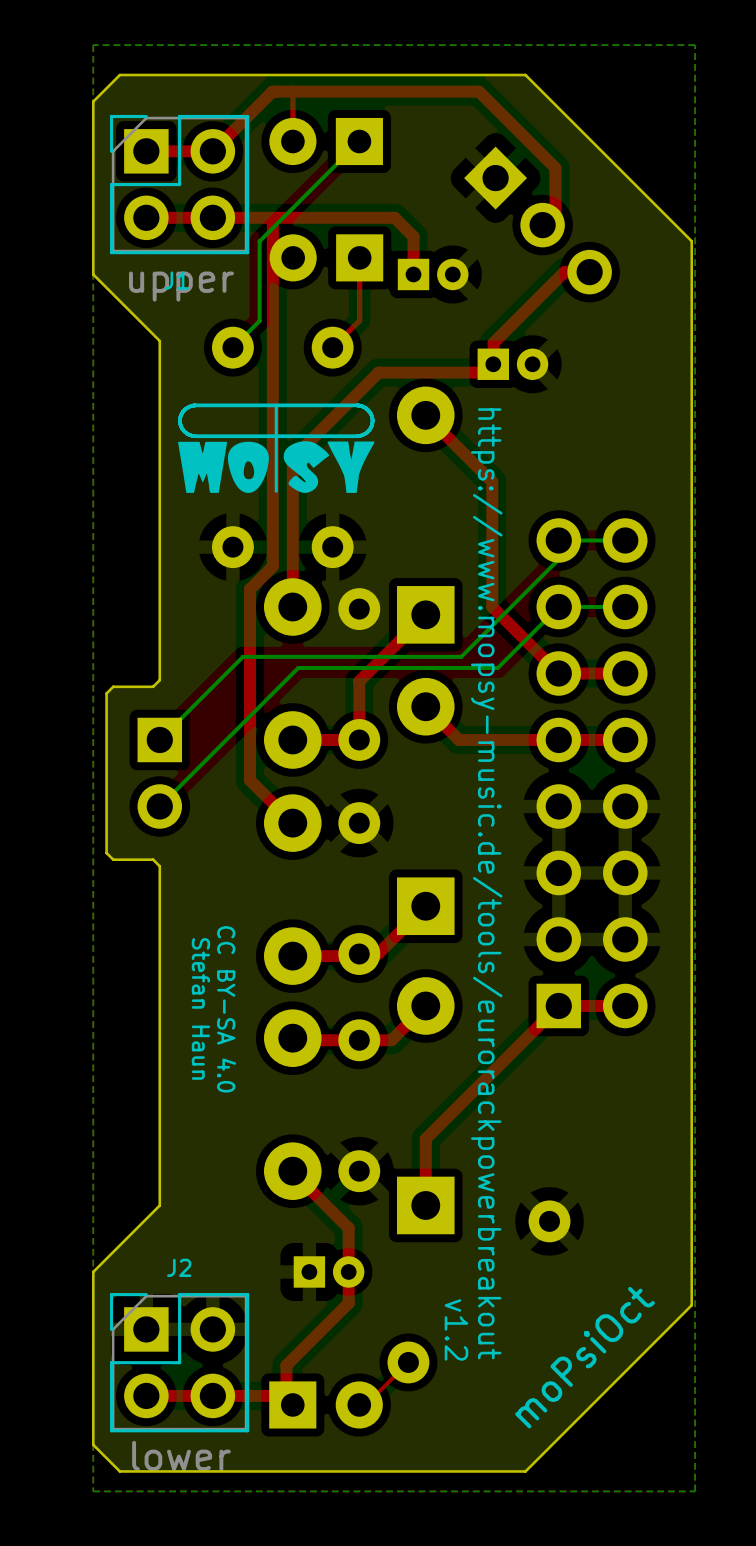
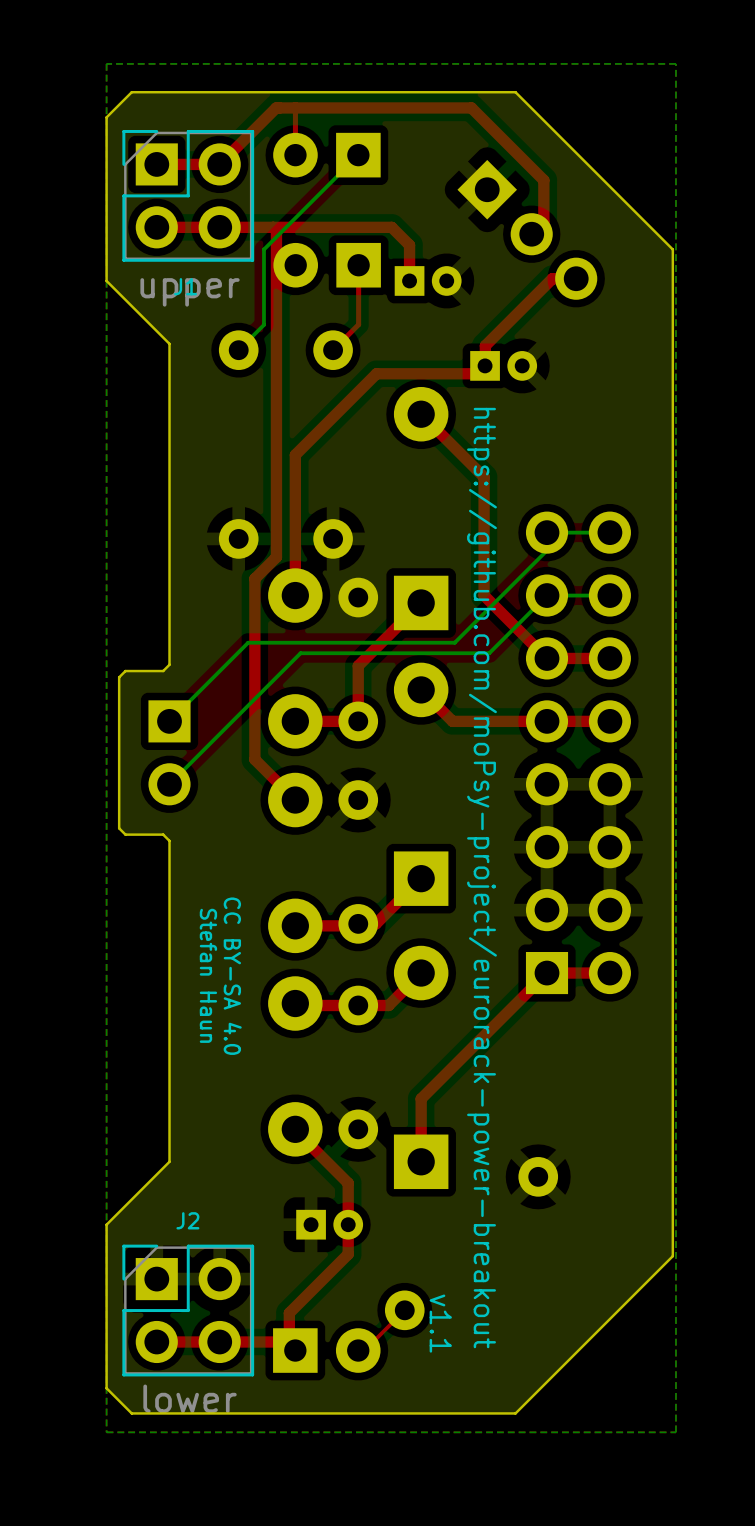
drawing: [178, 403, 375, 493] -> none
line: (196, 405) (186, 408) -> none
line: (356, 405) (366, 408) -> none
line: (182, 413) (179, 420) (182, 428) (188, 434) (196, 436) -> none
line: (370, 413) (372, 420) (370, 428) (364, 434) (356, 436) -> none
text: https://www.mopsy-music.de/tools/eurorackpowerbreakout (486, 883) -> https://github.com/moPsy-project/eurorack-power-breakout (481, 878)
text: v1.2 (456, 1329) -> v1.1 (440, 1323)
text: moPsiOct (585, 1357) -> none

